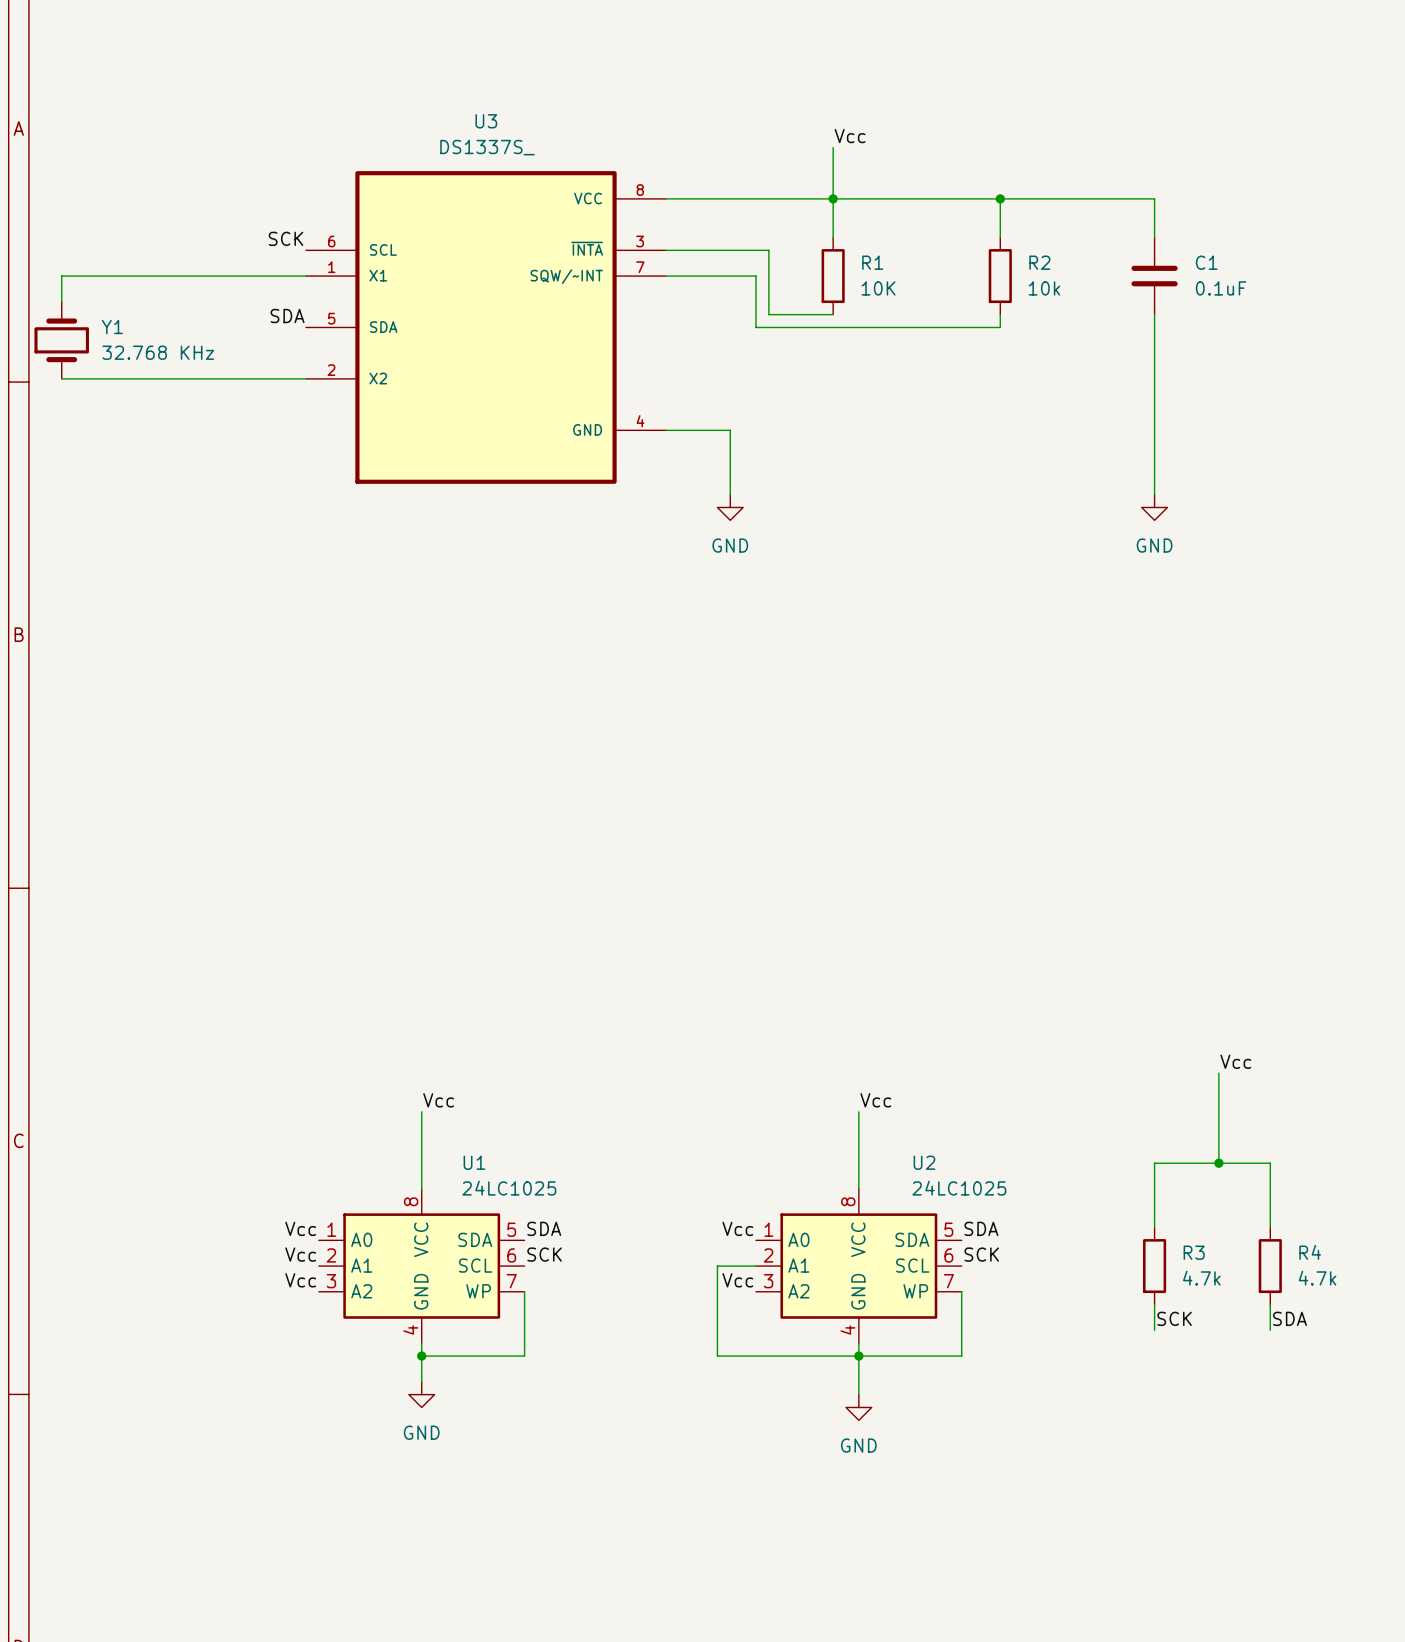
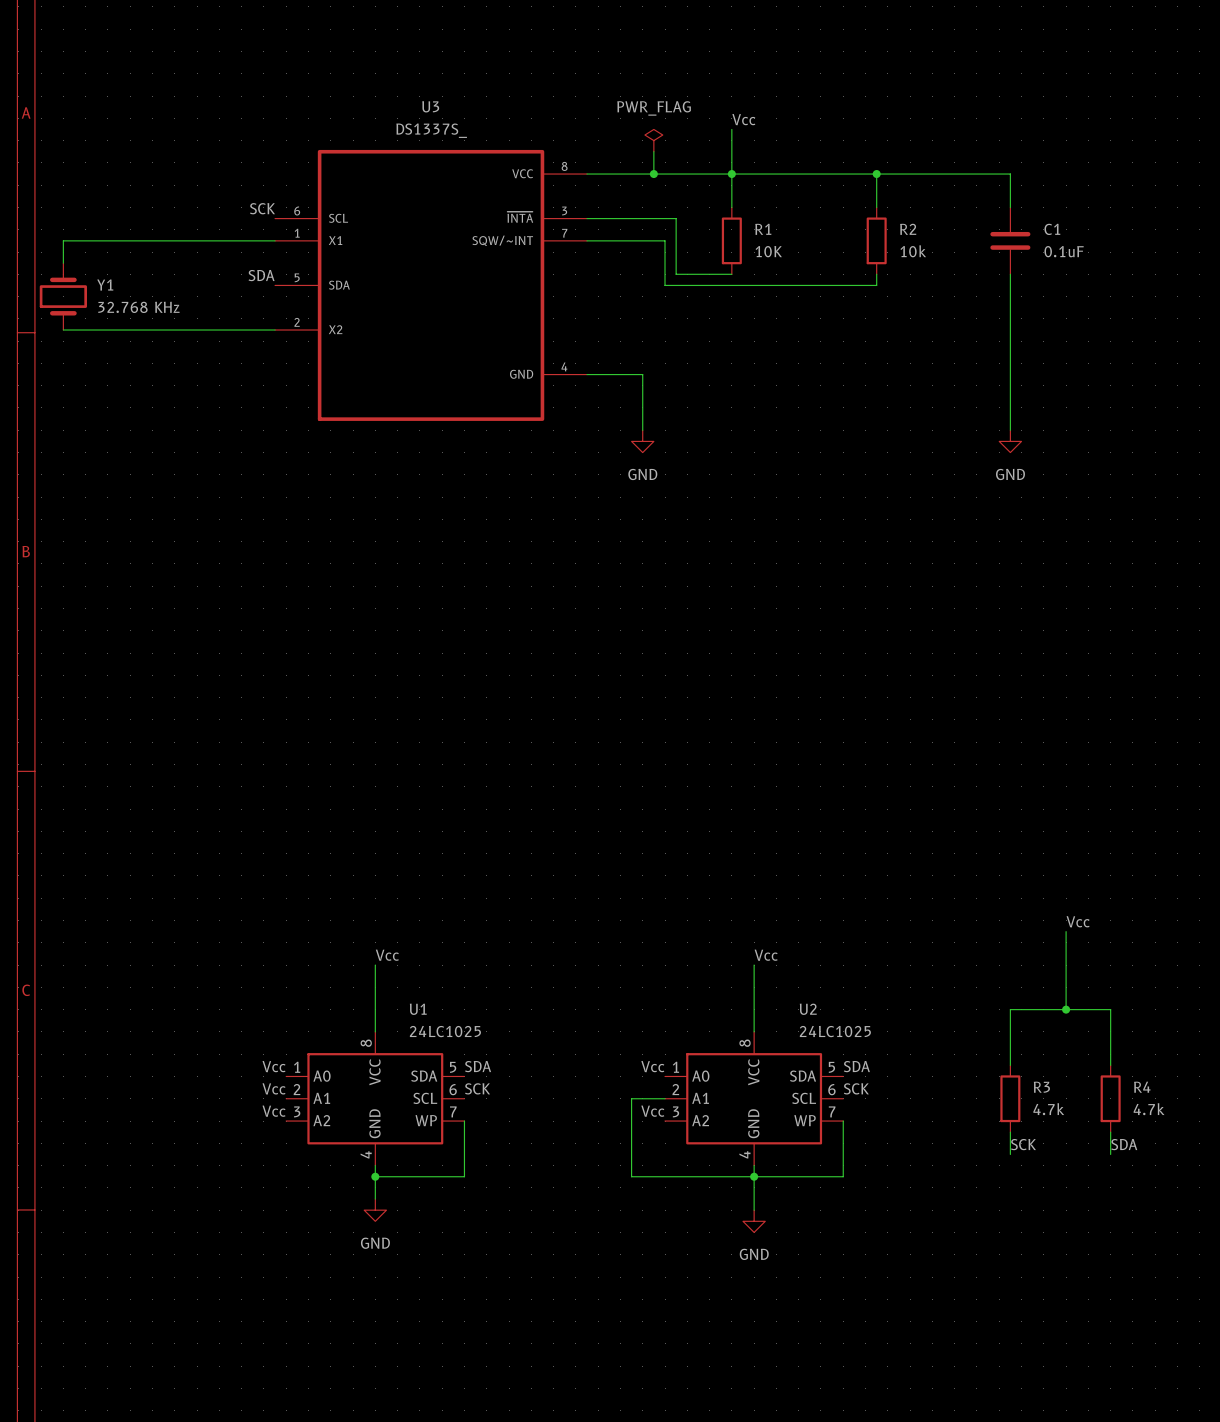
power symbol: none -> PWR_FLAG (653, 140)
wire: none -> (653, 151) (653, 174)
junction: none -> (653, 174)

